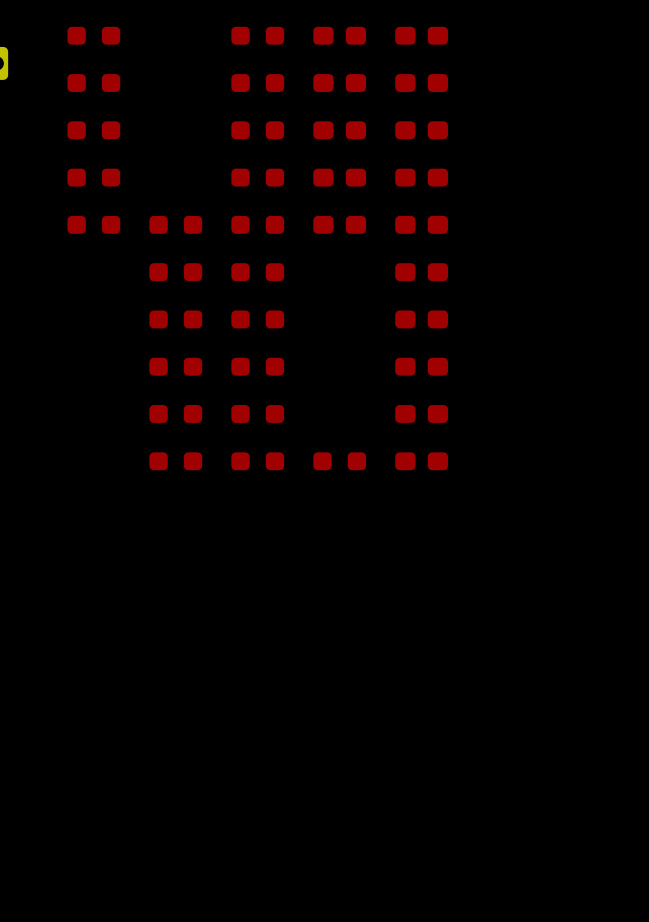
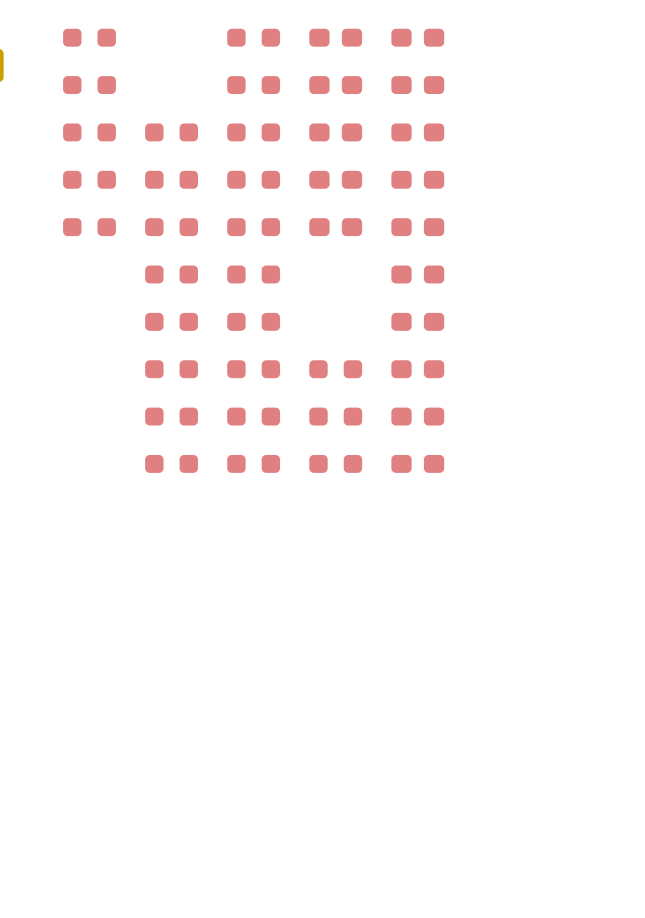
part: none -> (171, 132)
part: none -> (171, 179)
part: none -> (335, 369)
part: none -> (335, 416)

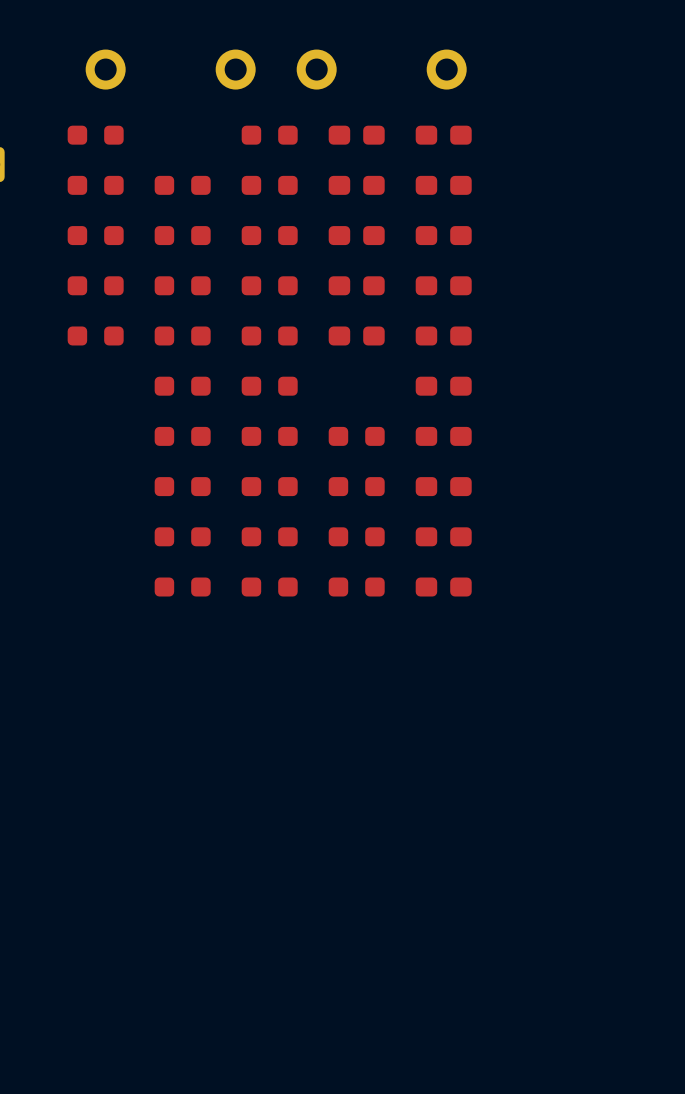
part: none -> (182, 185)
part: none -> (356, 436)

